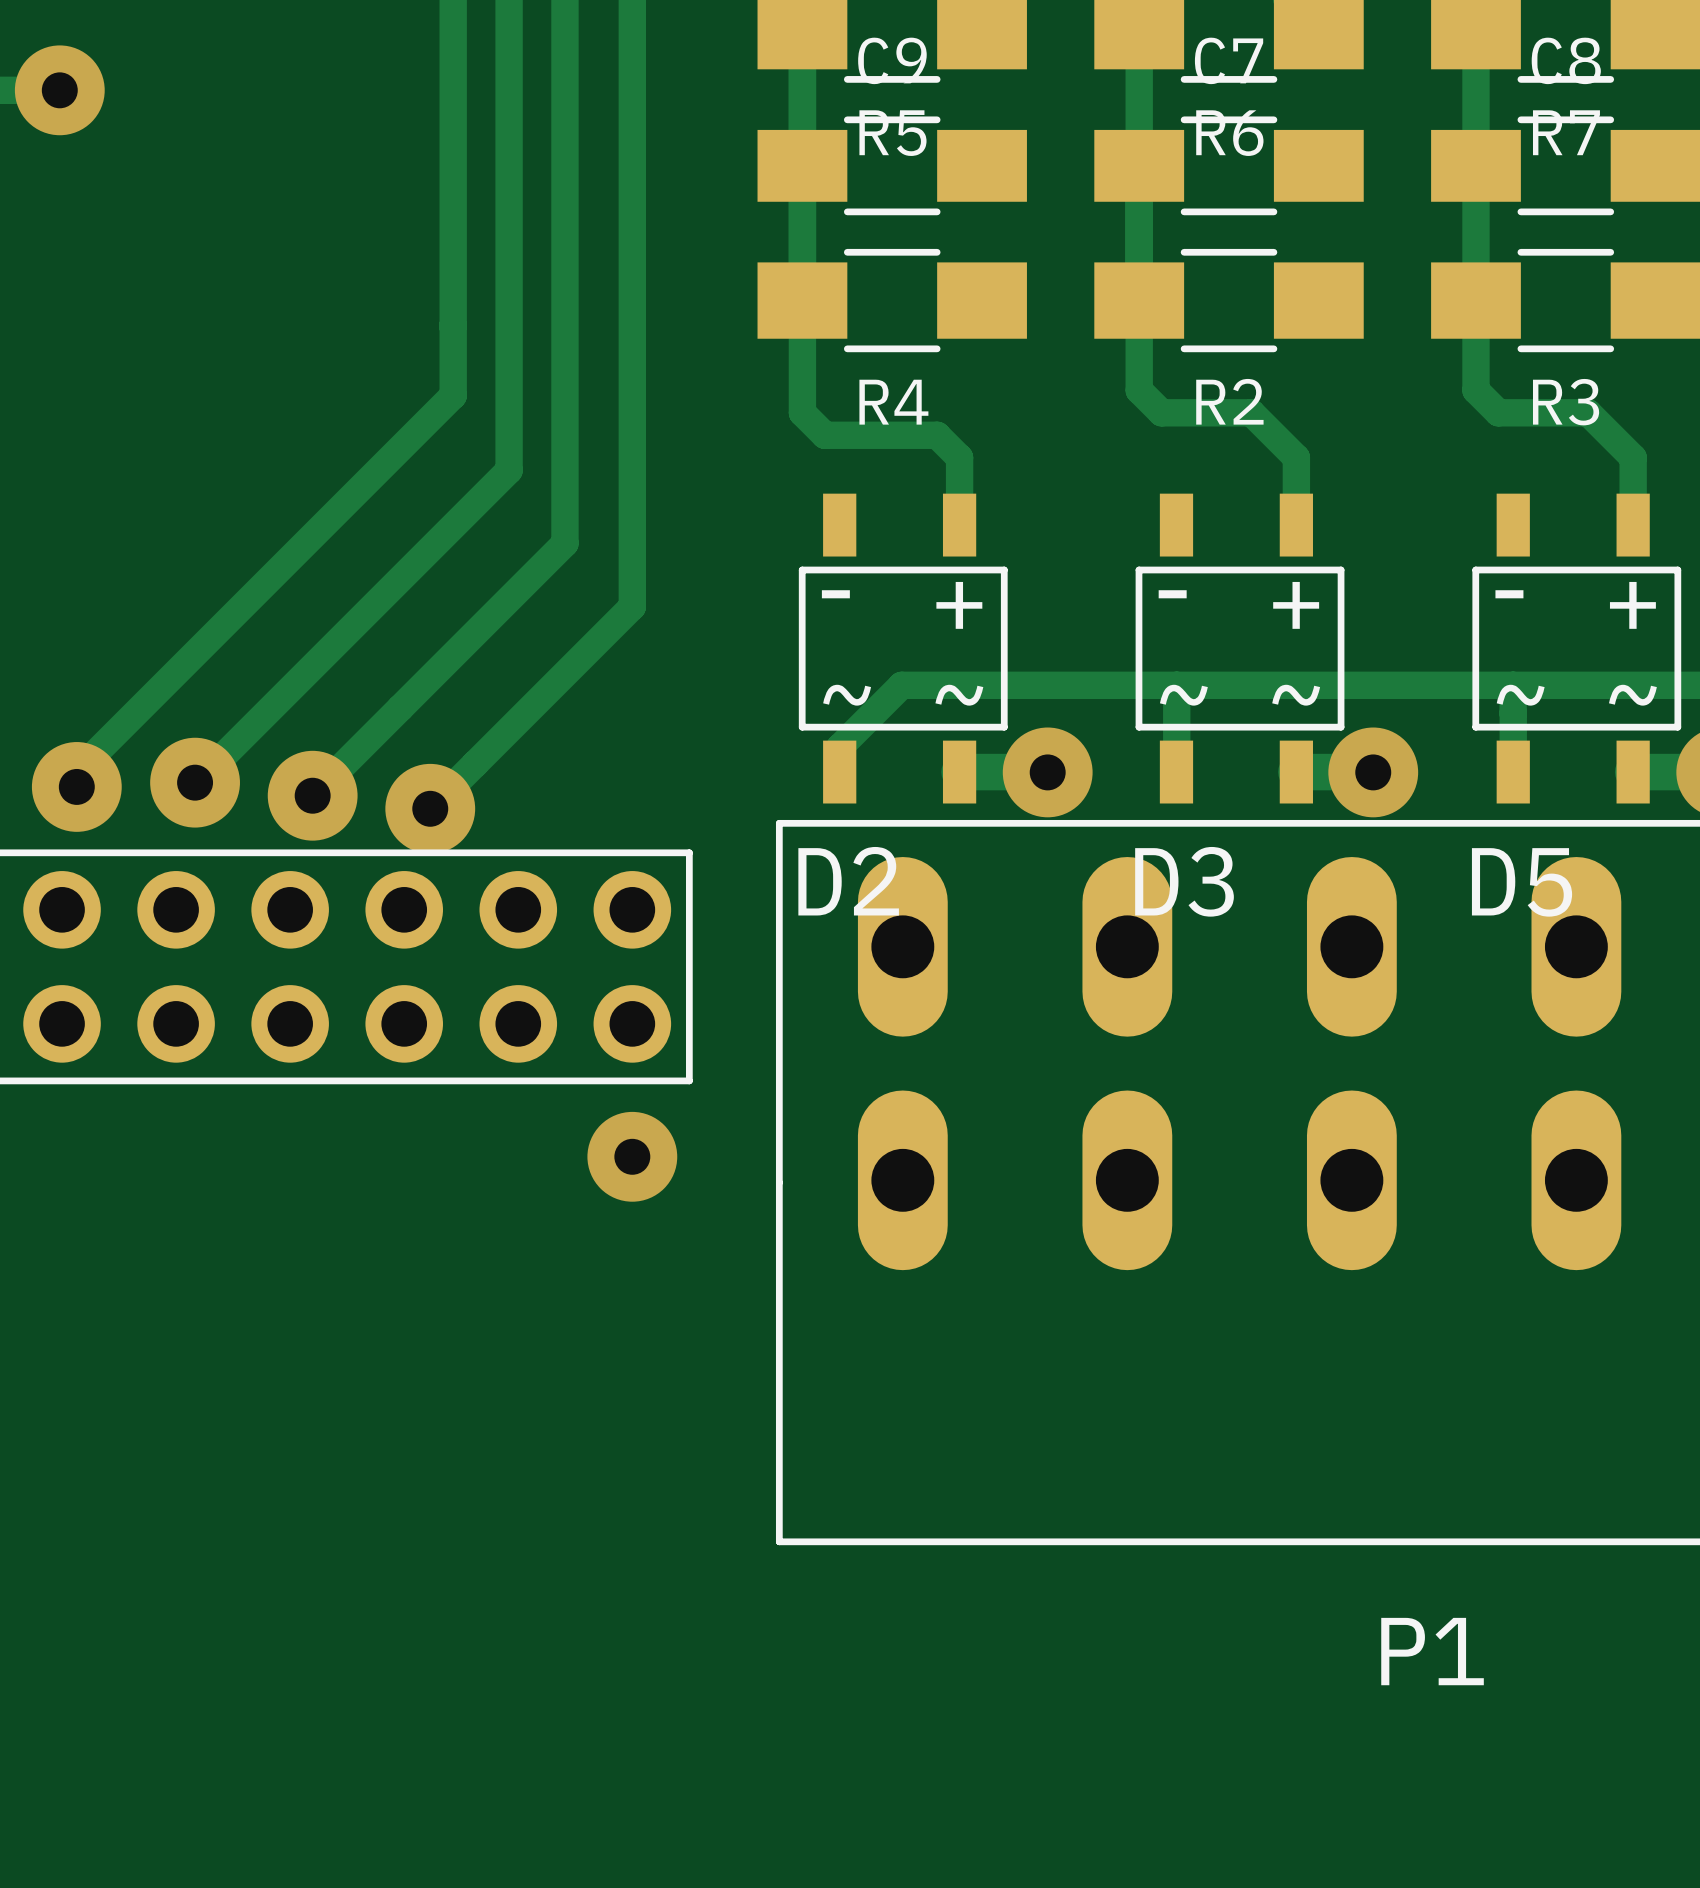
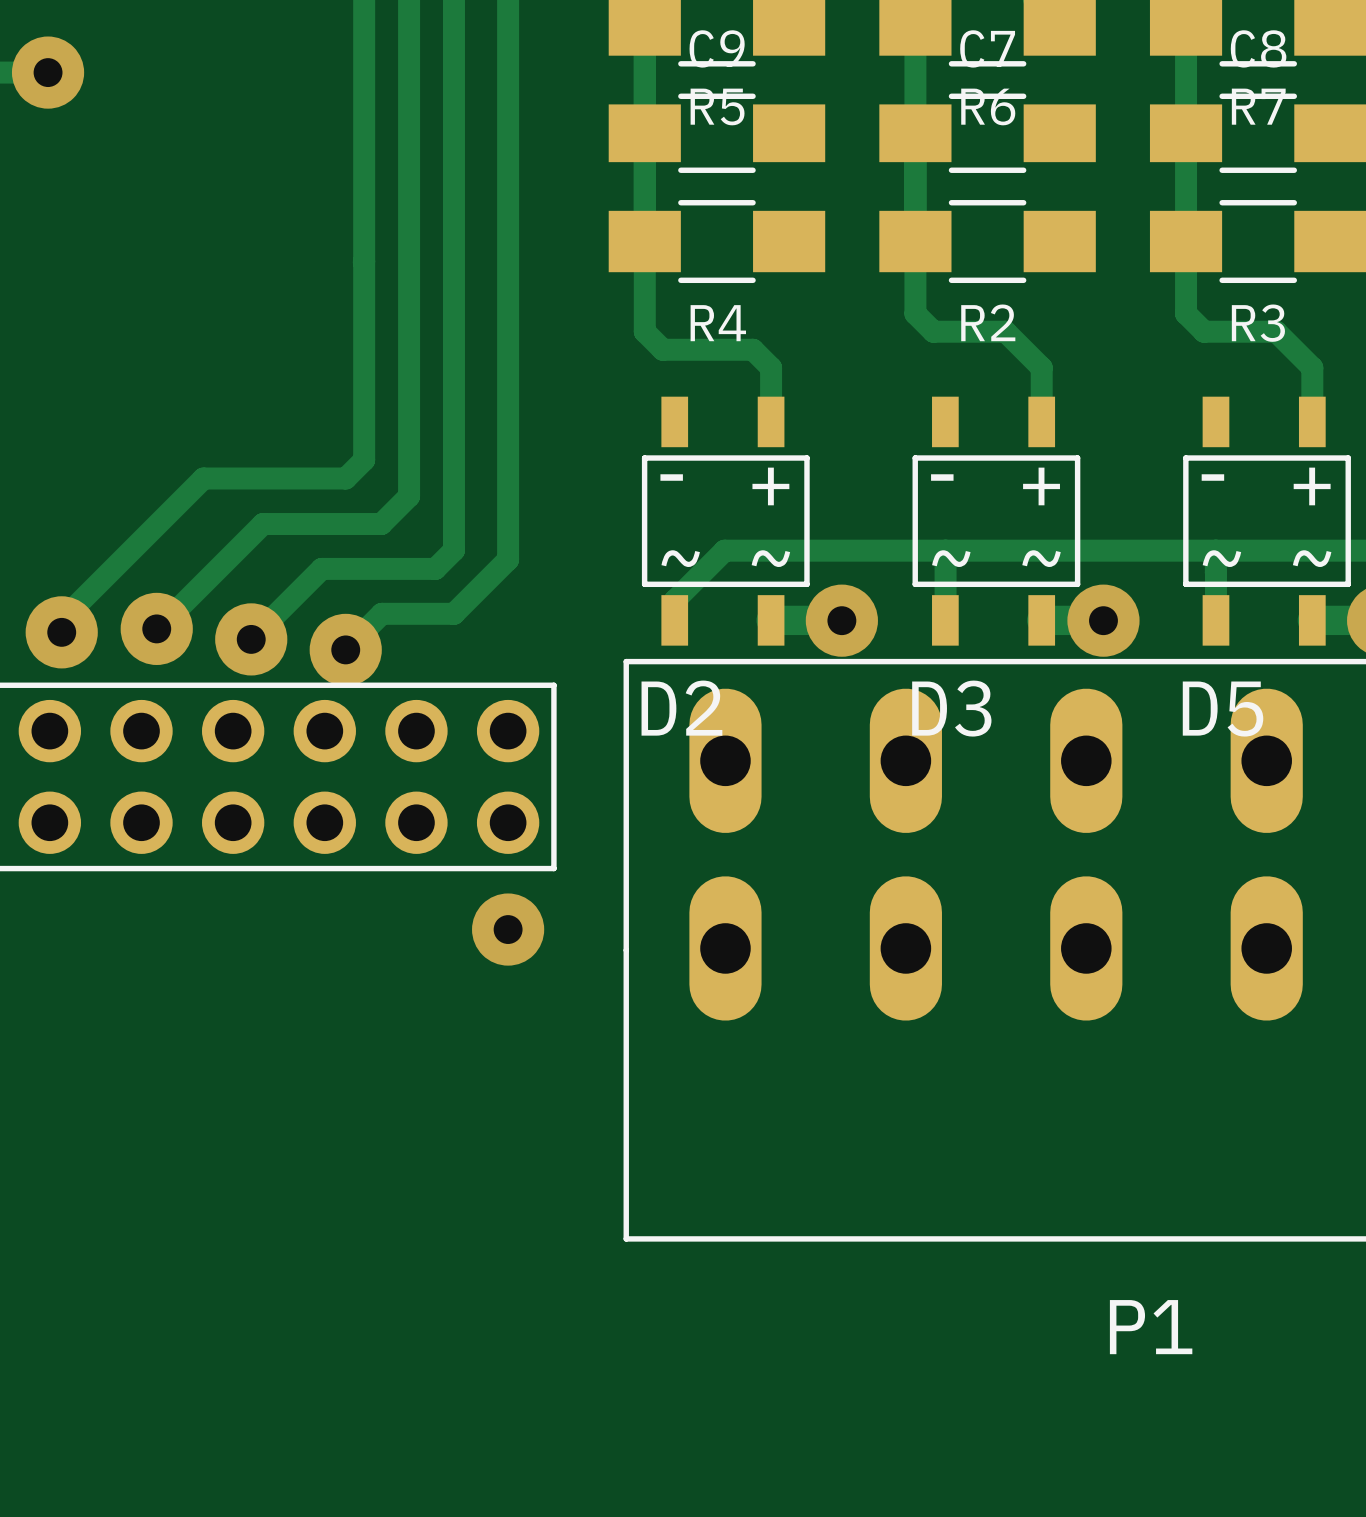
track: (453, 395) (253, 595) -> (364, 317) (364, 460) (345, 478) (203, 478)
track: (509, 470) (327, 652) -> (409, 377) (409, 496) (381, 524) (263, 524)
track: (564, 543) (400, 708) -> (453, 436) (453, 550) (435, 568) (321, 568)
track: (632, 606) (475, 763) -> (508, 487) (508, 559) (453, 613) (381, 613)

